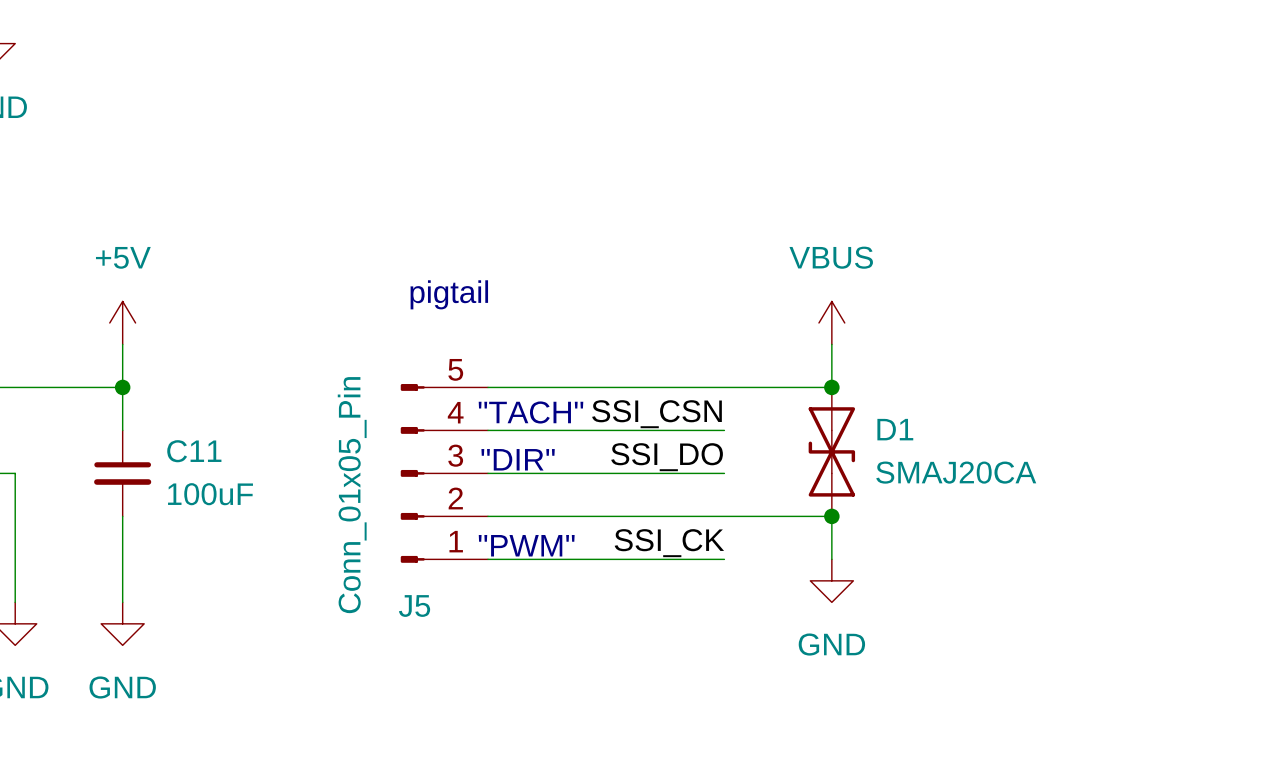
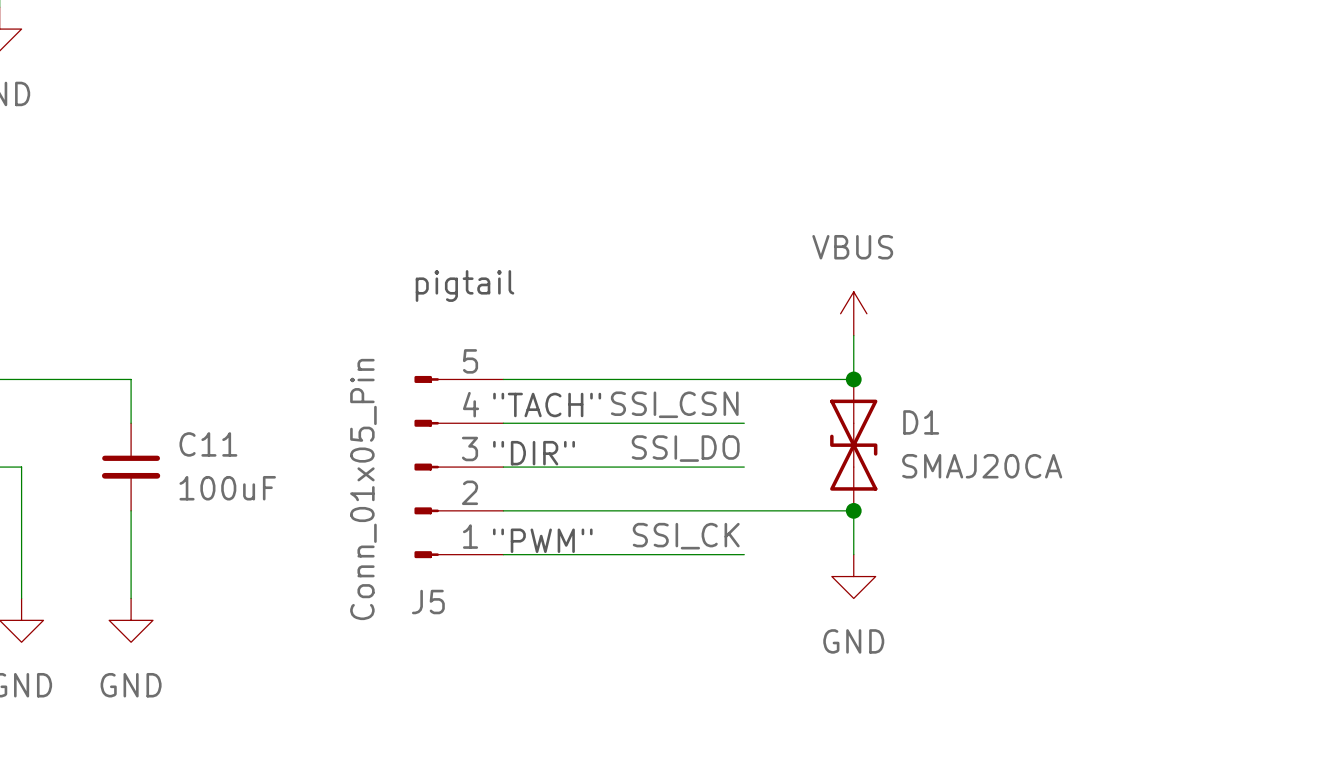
power symbol: +5V (122, 322) -> none
wire: (122, 344) (122, 387) -> none
junction: (122, 387) -> none

